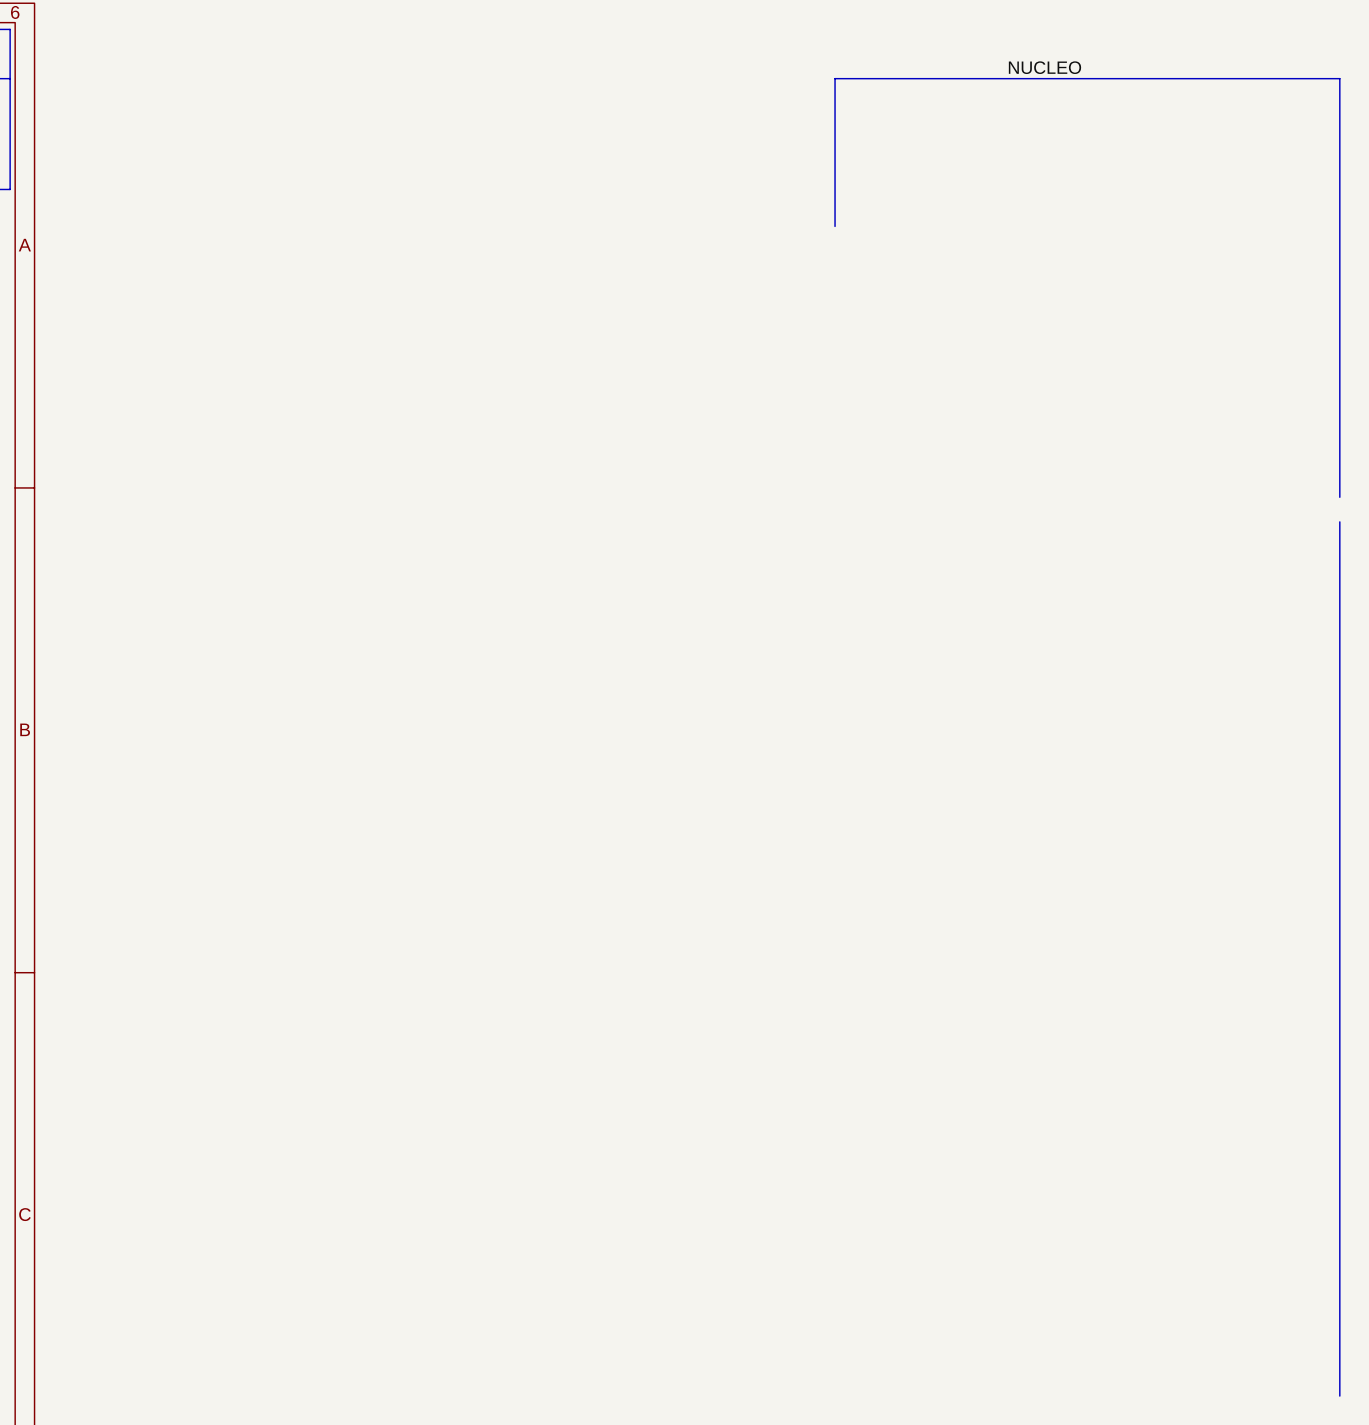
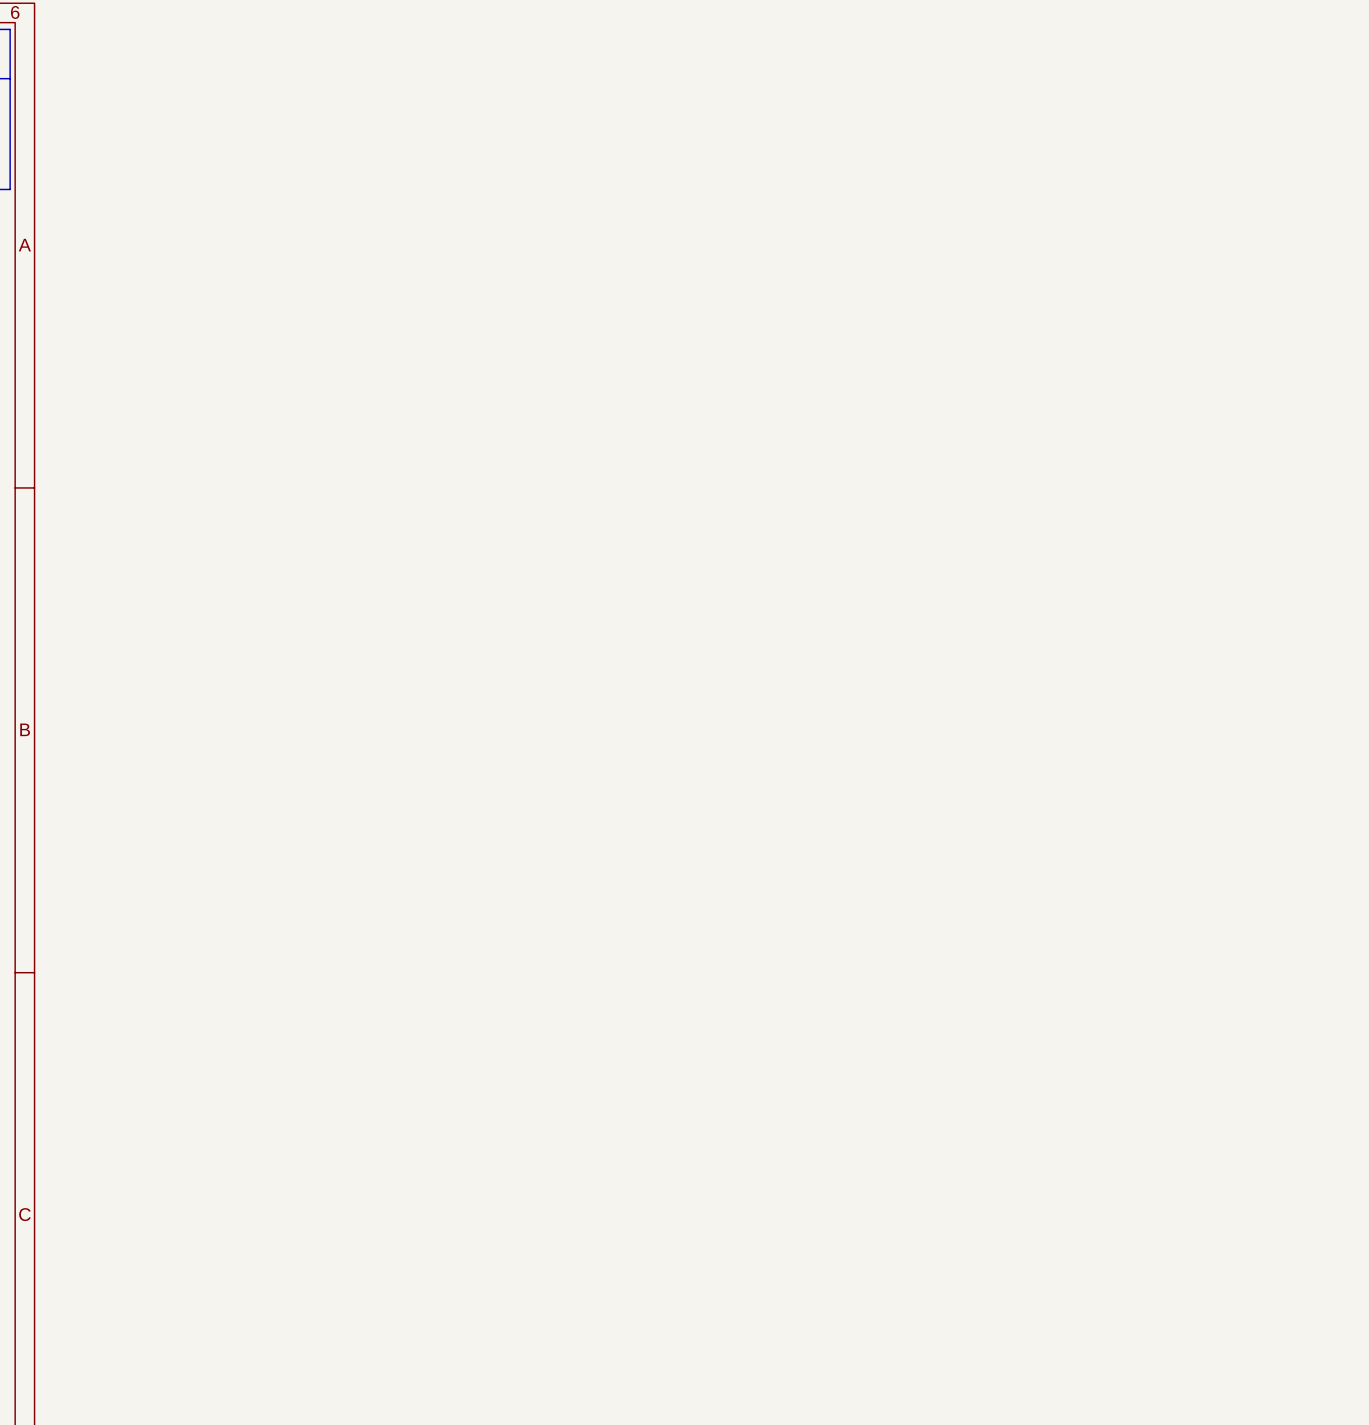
label: NUCLEO (1044, 67) -> none
bus: (835, 226) (835, 78) (1339, 78) (1339, 497) -> none
bus: (1339, 521) (1339, 1396) -> none

